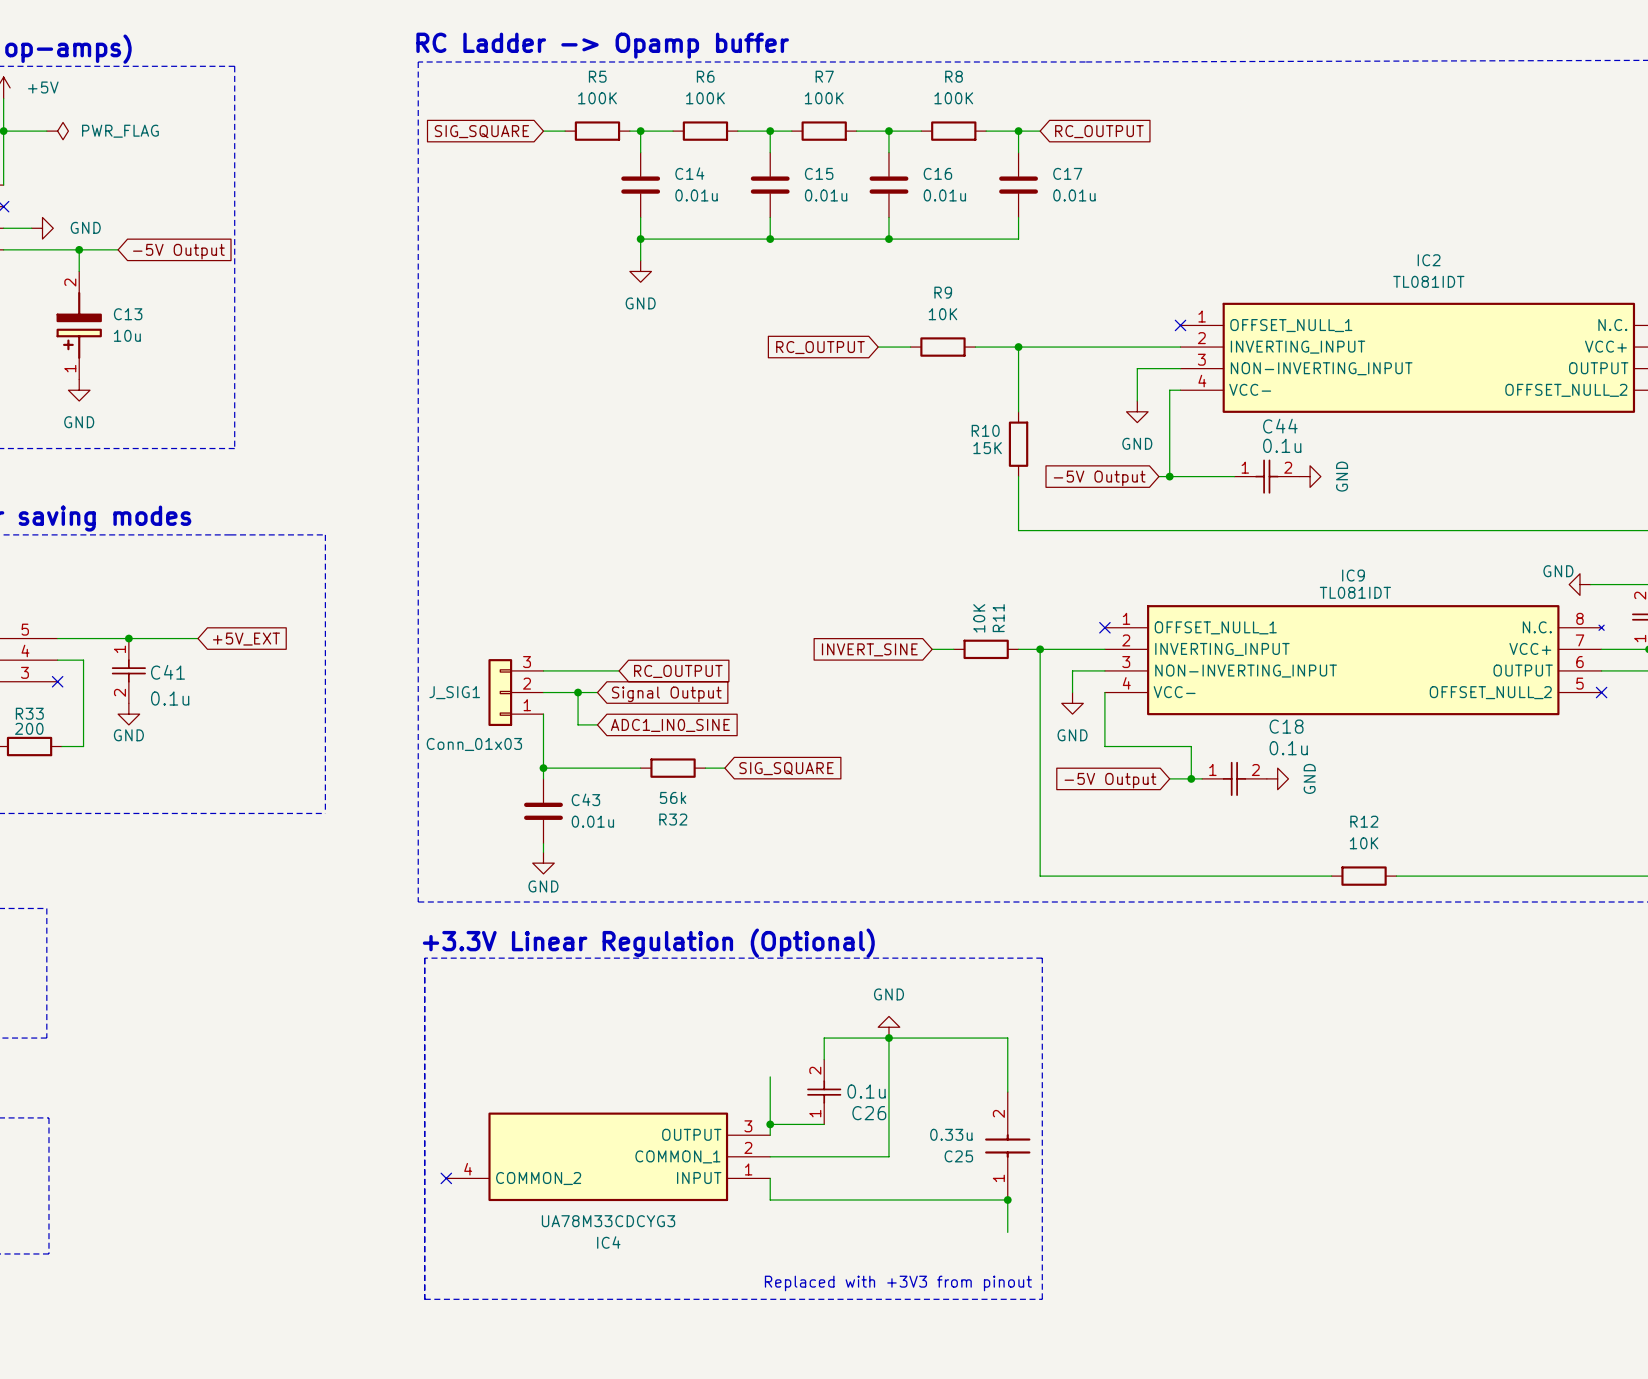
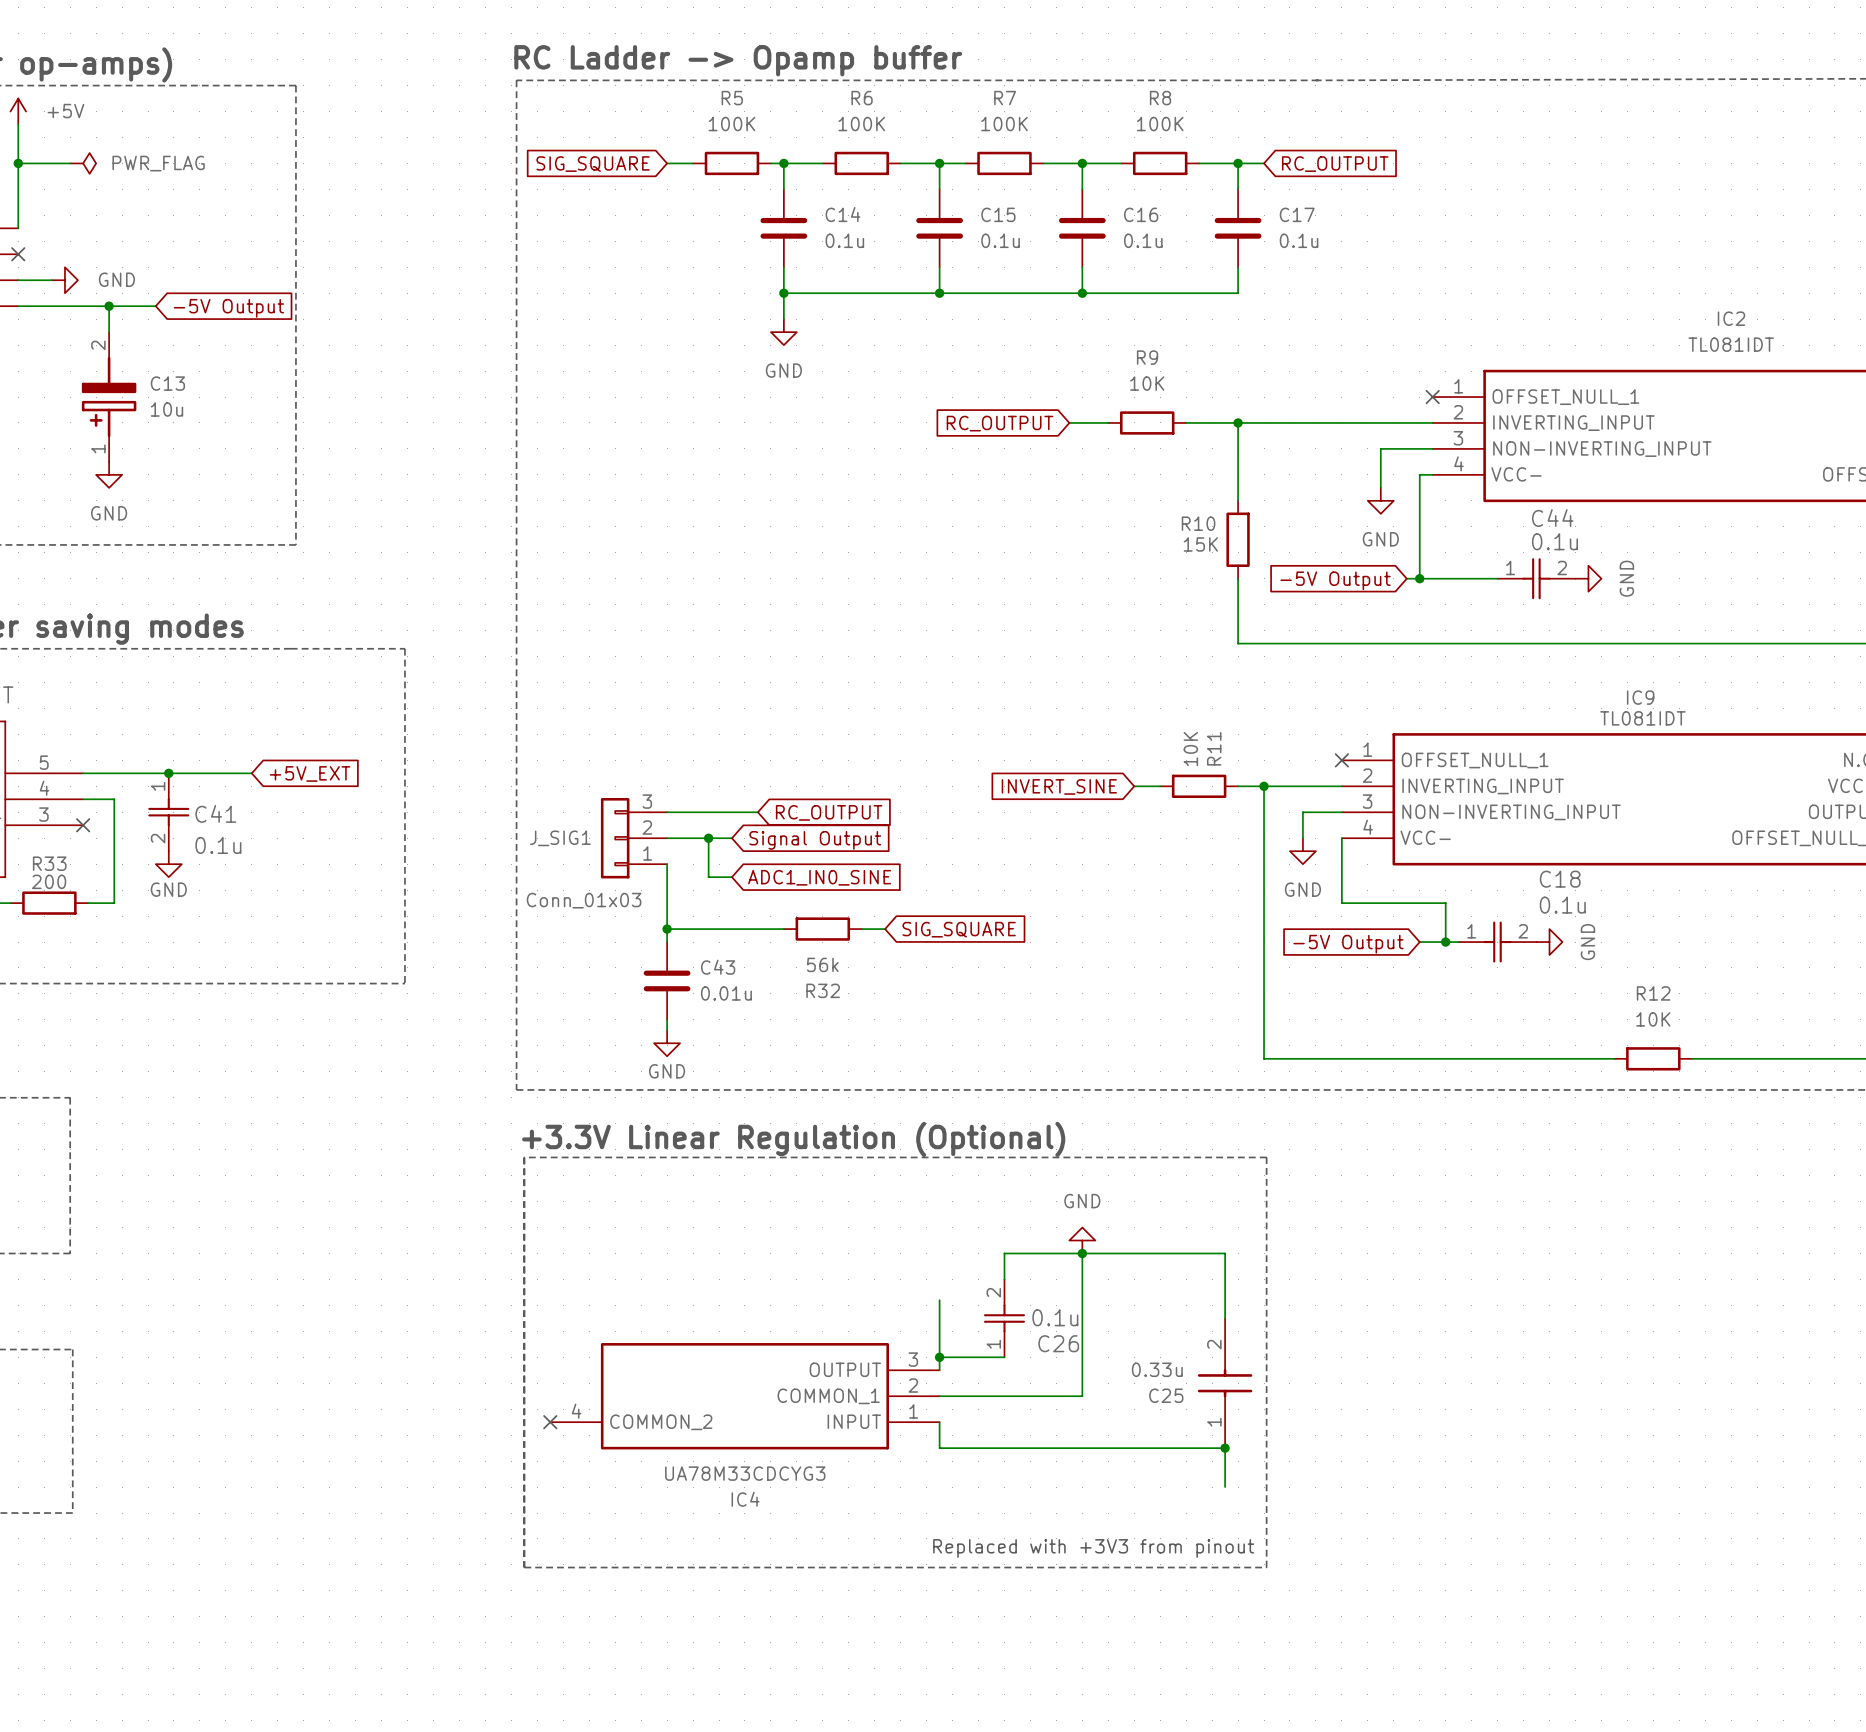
C14 value: 0.01u (696, 195) -> 0.1u (844, 240)
C15 value: 0.01u (826, 195) -> 0.1u (1000, 240)
C16 value: 0.01u (944, 195) -> 0.1u (1143, 240)
C17 value: 0.01u (1074, 195) -> 0.1u (1299, 240)

